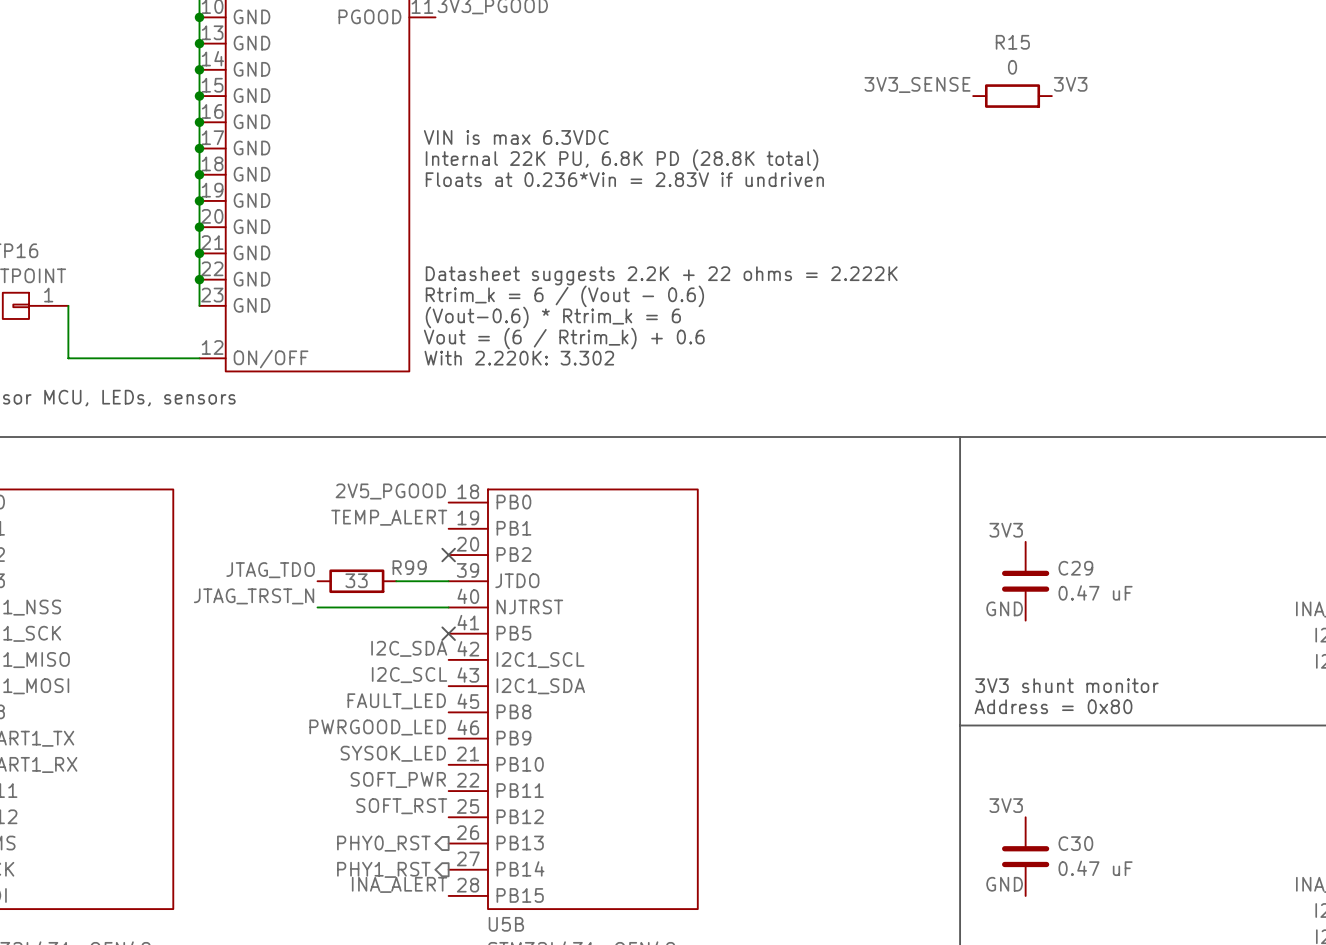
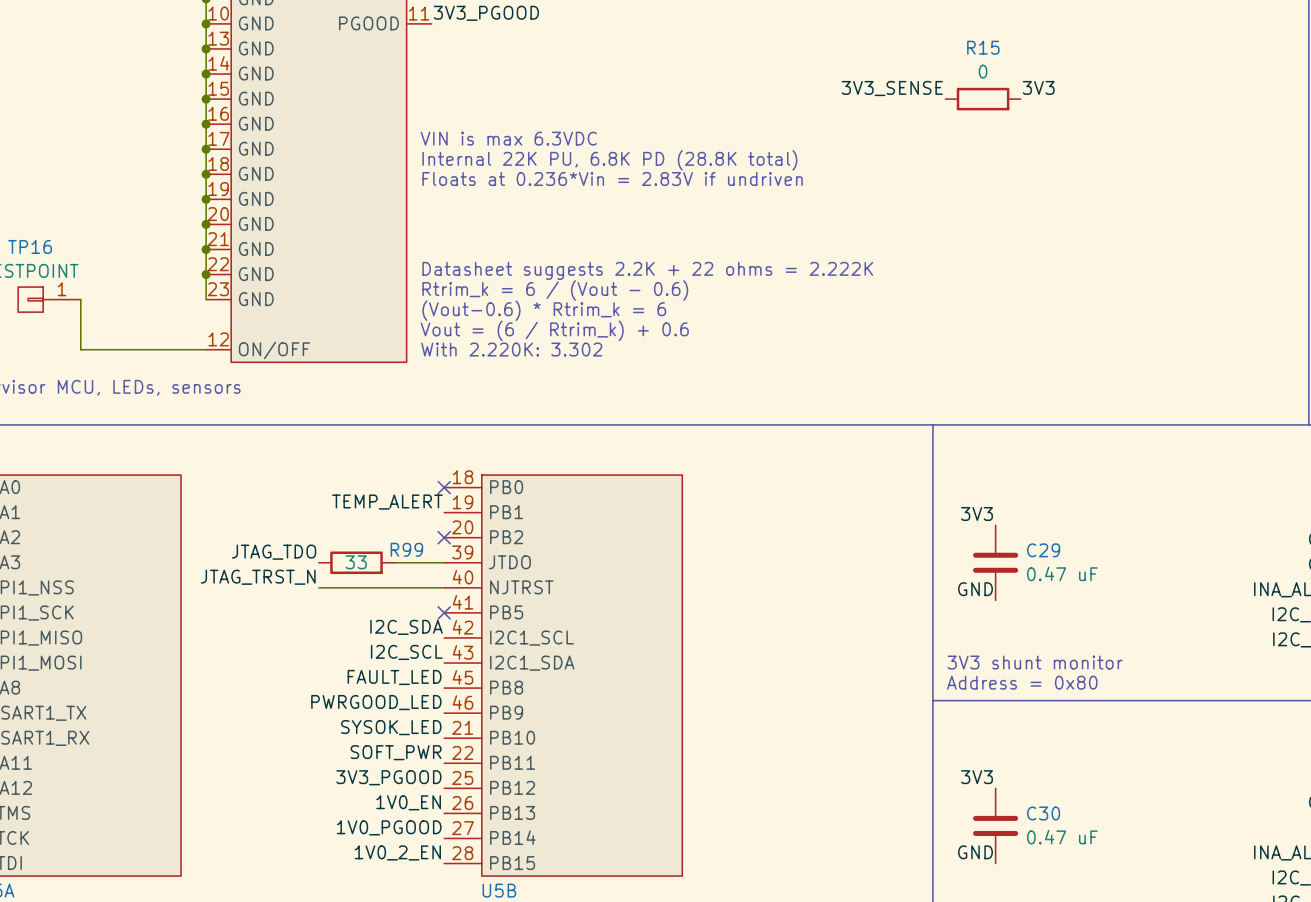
label: 2V5_PGOOD (390, 491) -> none
no-connect mark: none -> (444, 487)
label: SOFT_RST (401, 806) -> 3V3_PGOOD (388, 777)
label: none -> 1V0_EN (408, 802)
hierarchical label: PHY0_RST (383, 843) -> none
label: none -> 1V0_PGOOD (389, 827)
hierarchical label: PHY1_RST (383, 869) -> none
label: INA_ALERT (399, 884) -> 1V0_2_EN (397, 852)

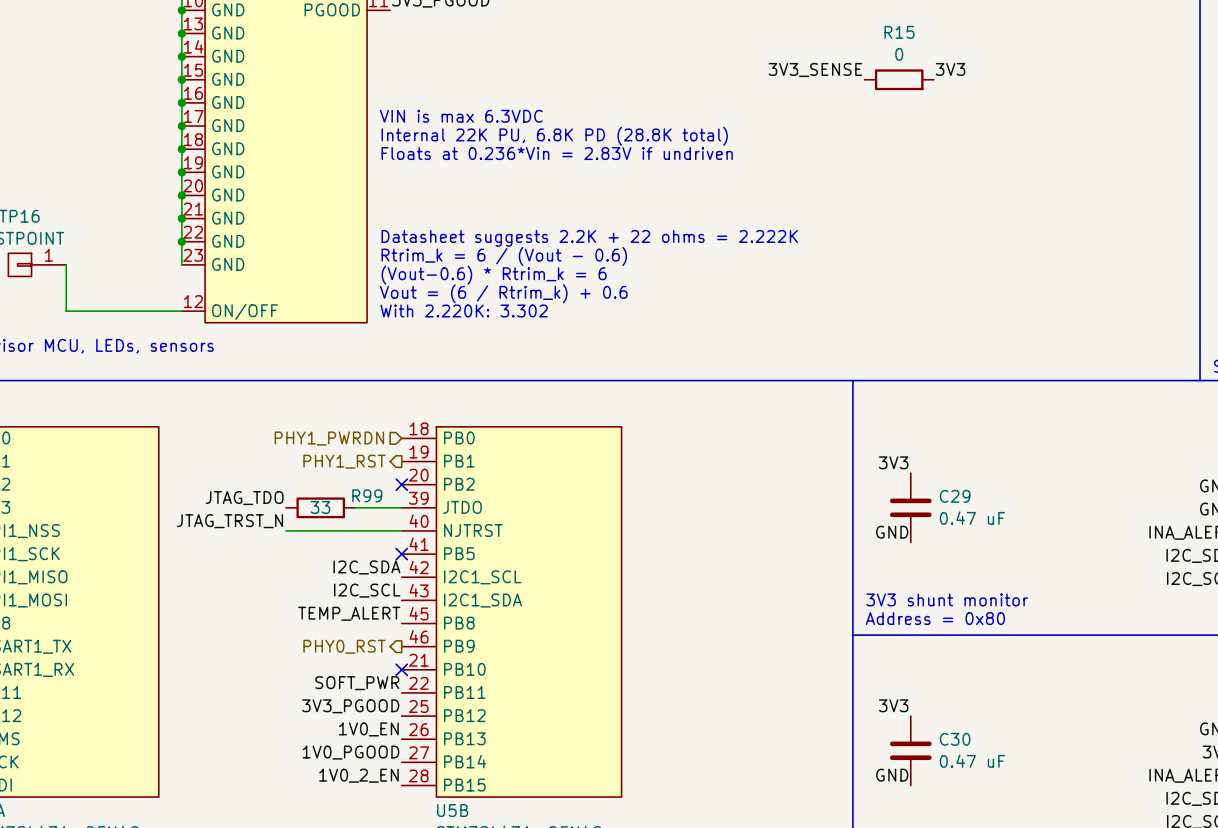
hierarchical label: none -> PHY1_PWRDN (329, 438)
no-connect mark: (444, 487) -> none
label: TEMP_ALERT (387, 502) -> none
hierarchical label: none -> PHY1_RST (344, 461)
label: FAULT_LED (394, 677) -> TEMP_ALERT (349, 613)
label: PWRGOOD_LED (376, 702) -> none
hierarchical label: none -> PHY0_RST (344, 646)
label: SYSOK_LED (391, 727) -> none
no-connect mark: none -> (401, 669)

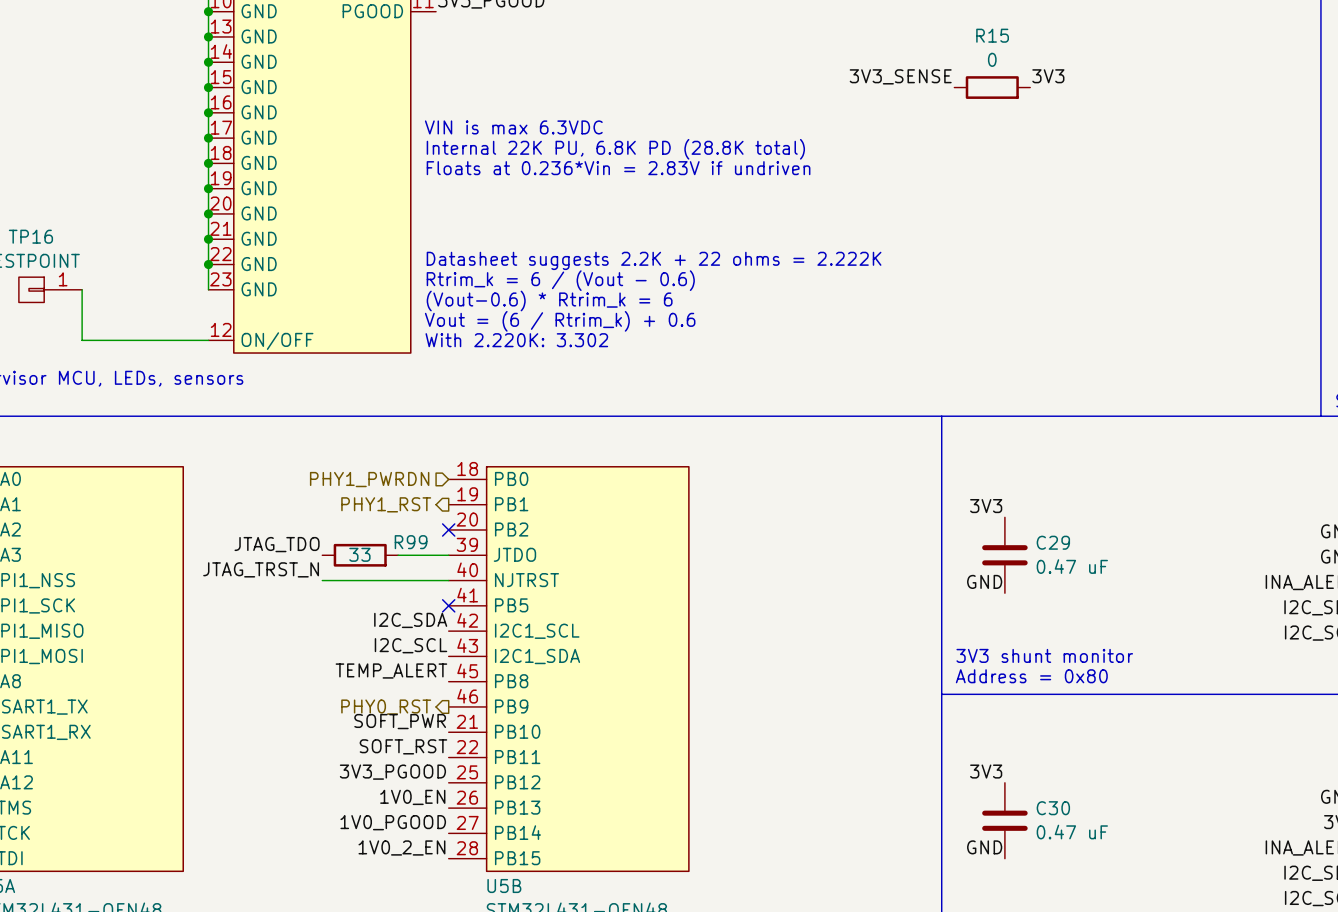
label: none -> SOFT_PWR (400, 721)
no-connect mark: (401, 669) -> none
label: SOFT_PWR (357, 683) -> SOFT_RST (403, 746)

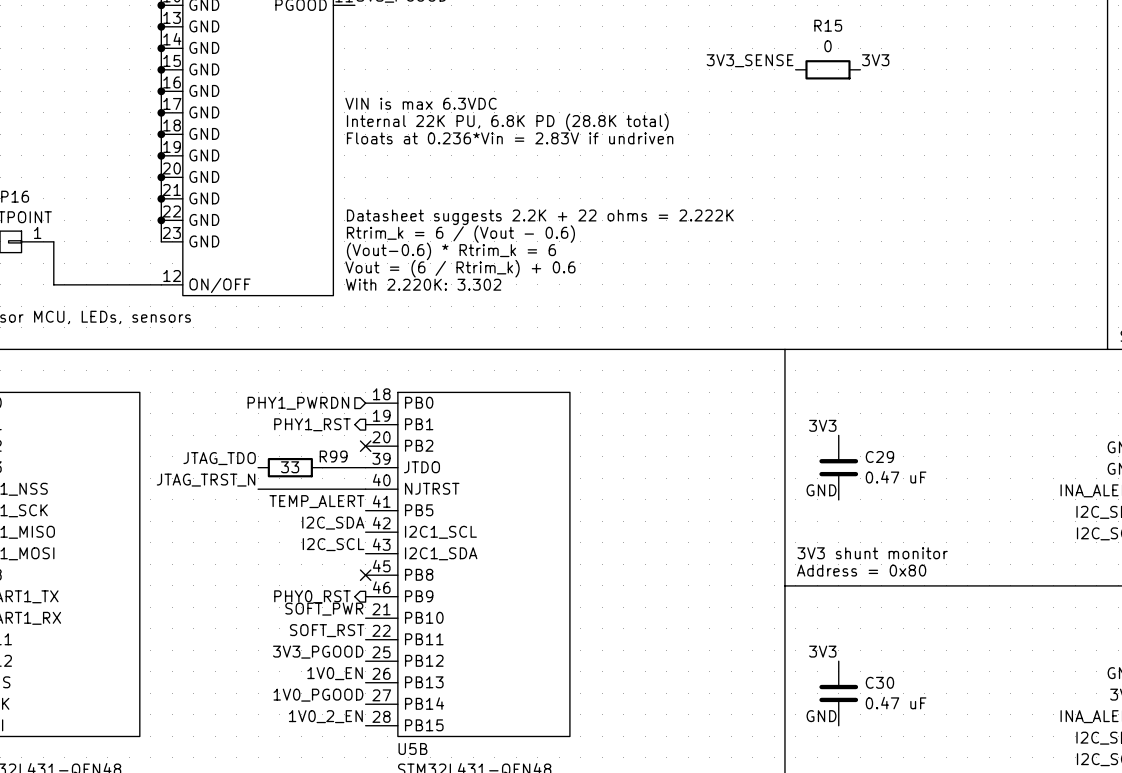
no-connect mark: (448, 605) -> none
label position: TEMP_ALERT (391, 671) -> TEMP_ALERT (316, 501)
no-connect mark: none -> (365, 575)

